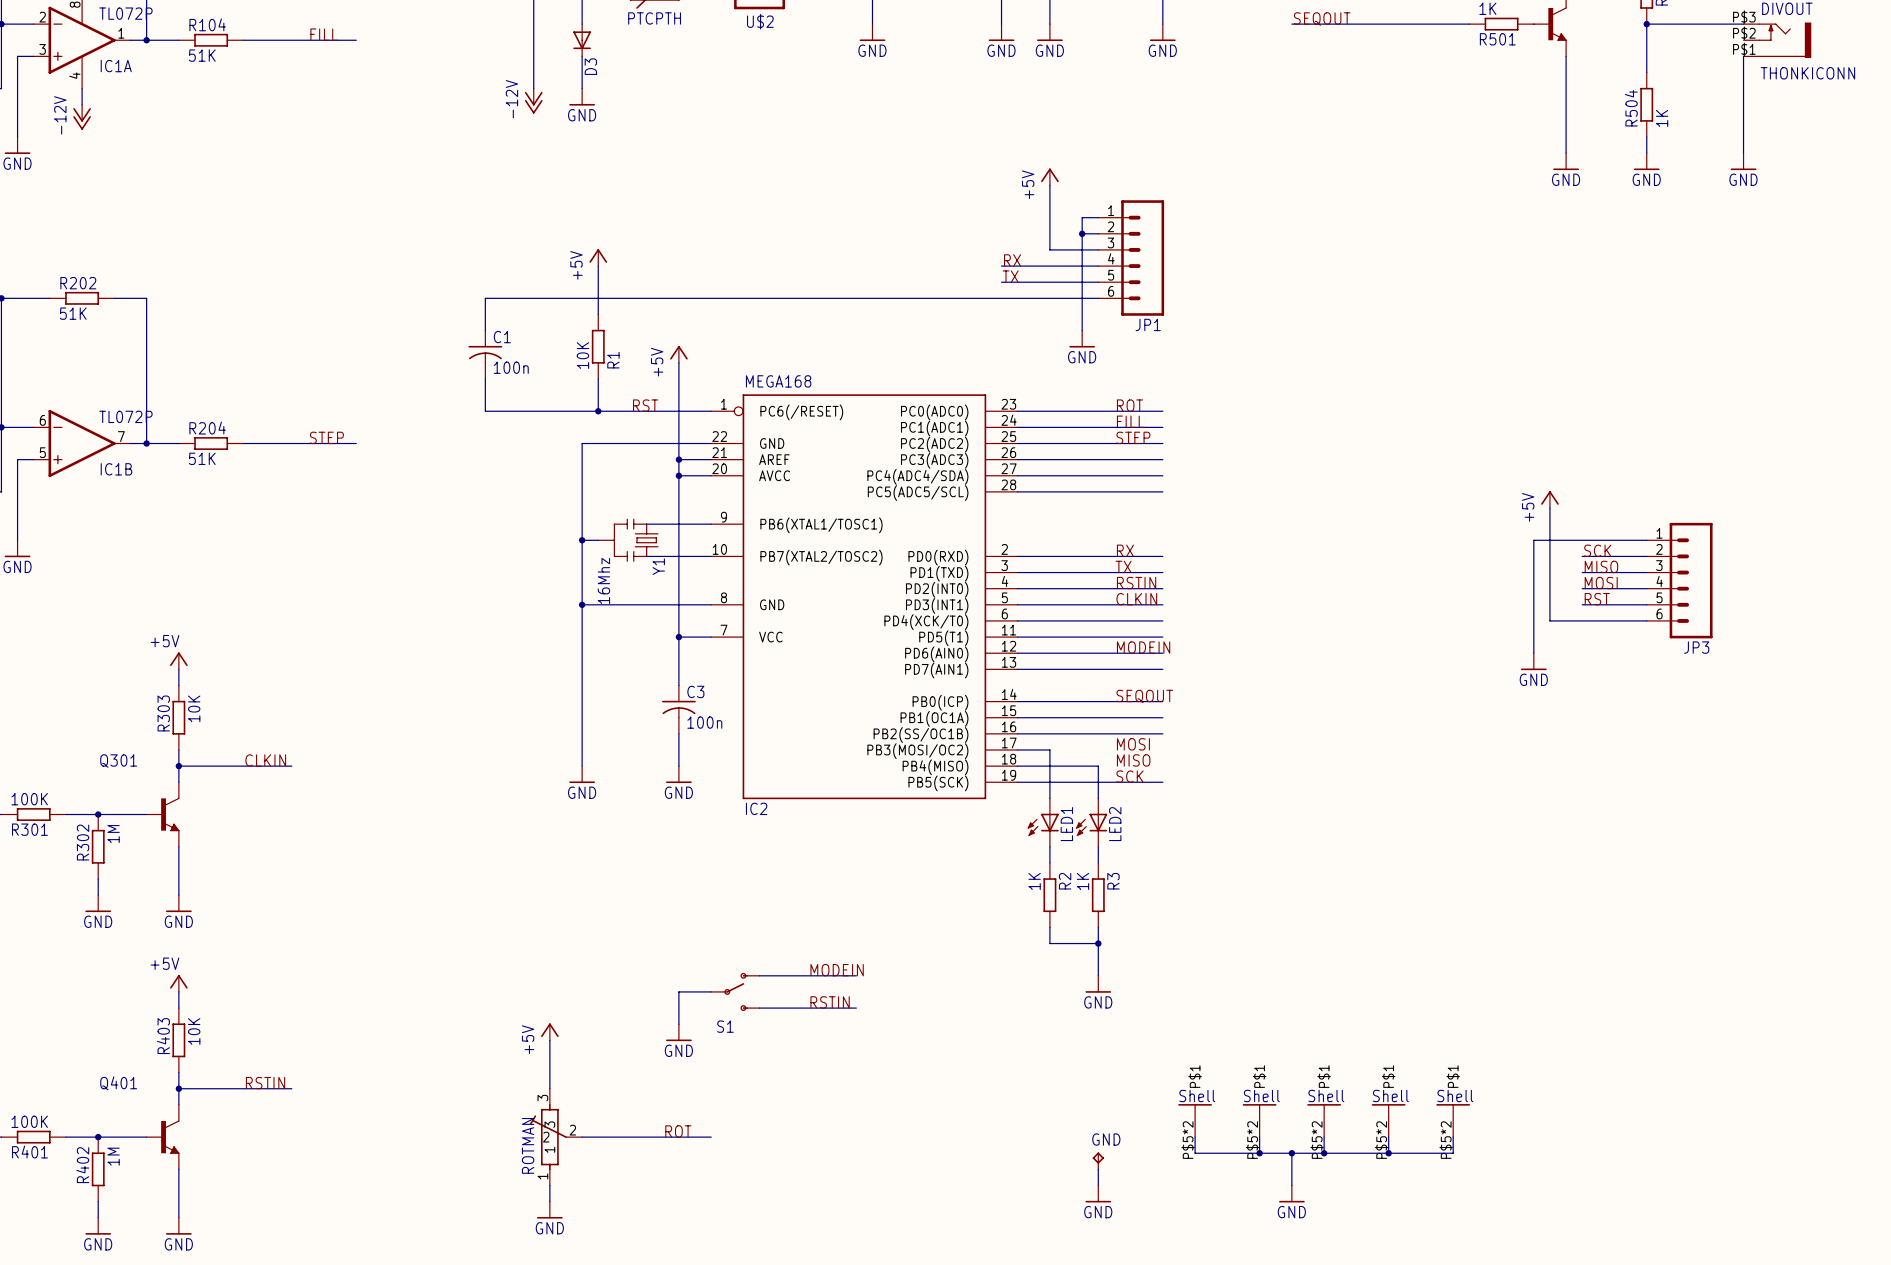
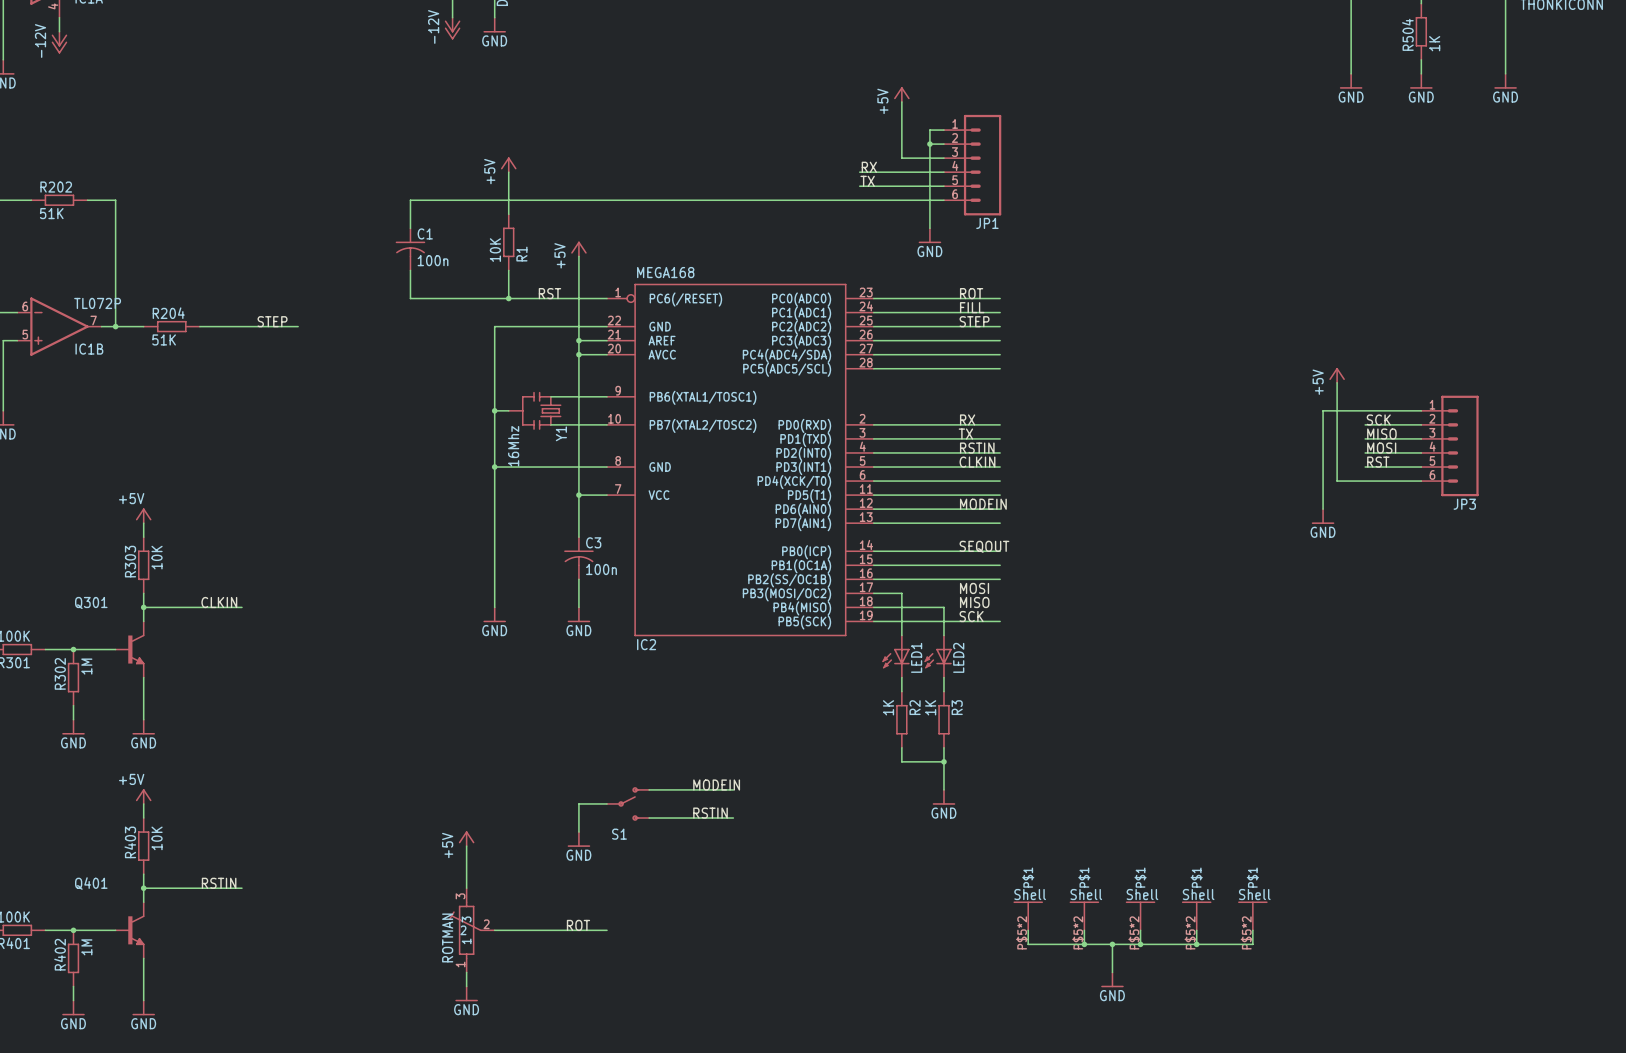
GND: (1098, 1160) -> none
wire: (1098, 1169) (1098, 1185) -> none
power symbol: GND (1098, 1193) -> none

